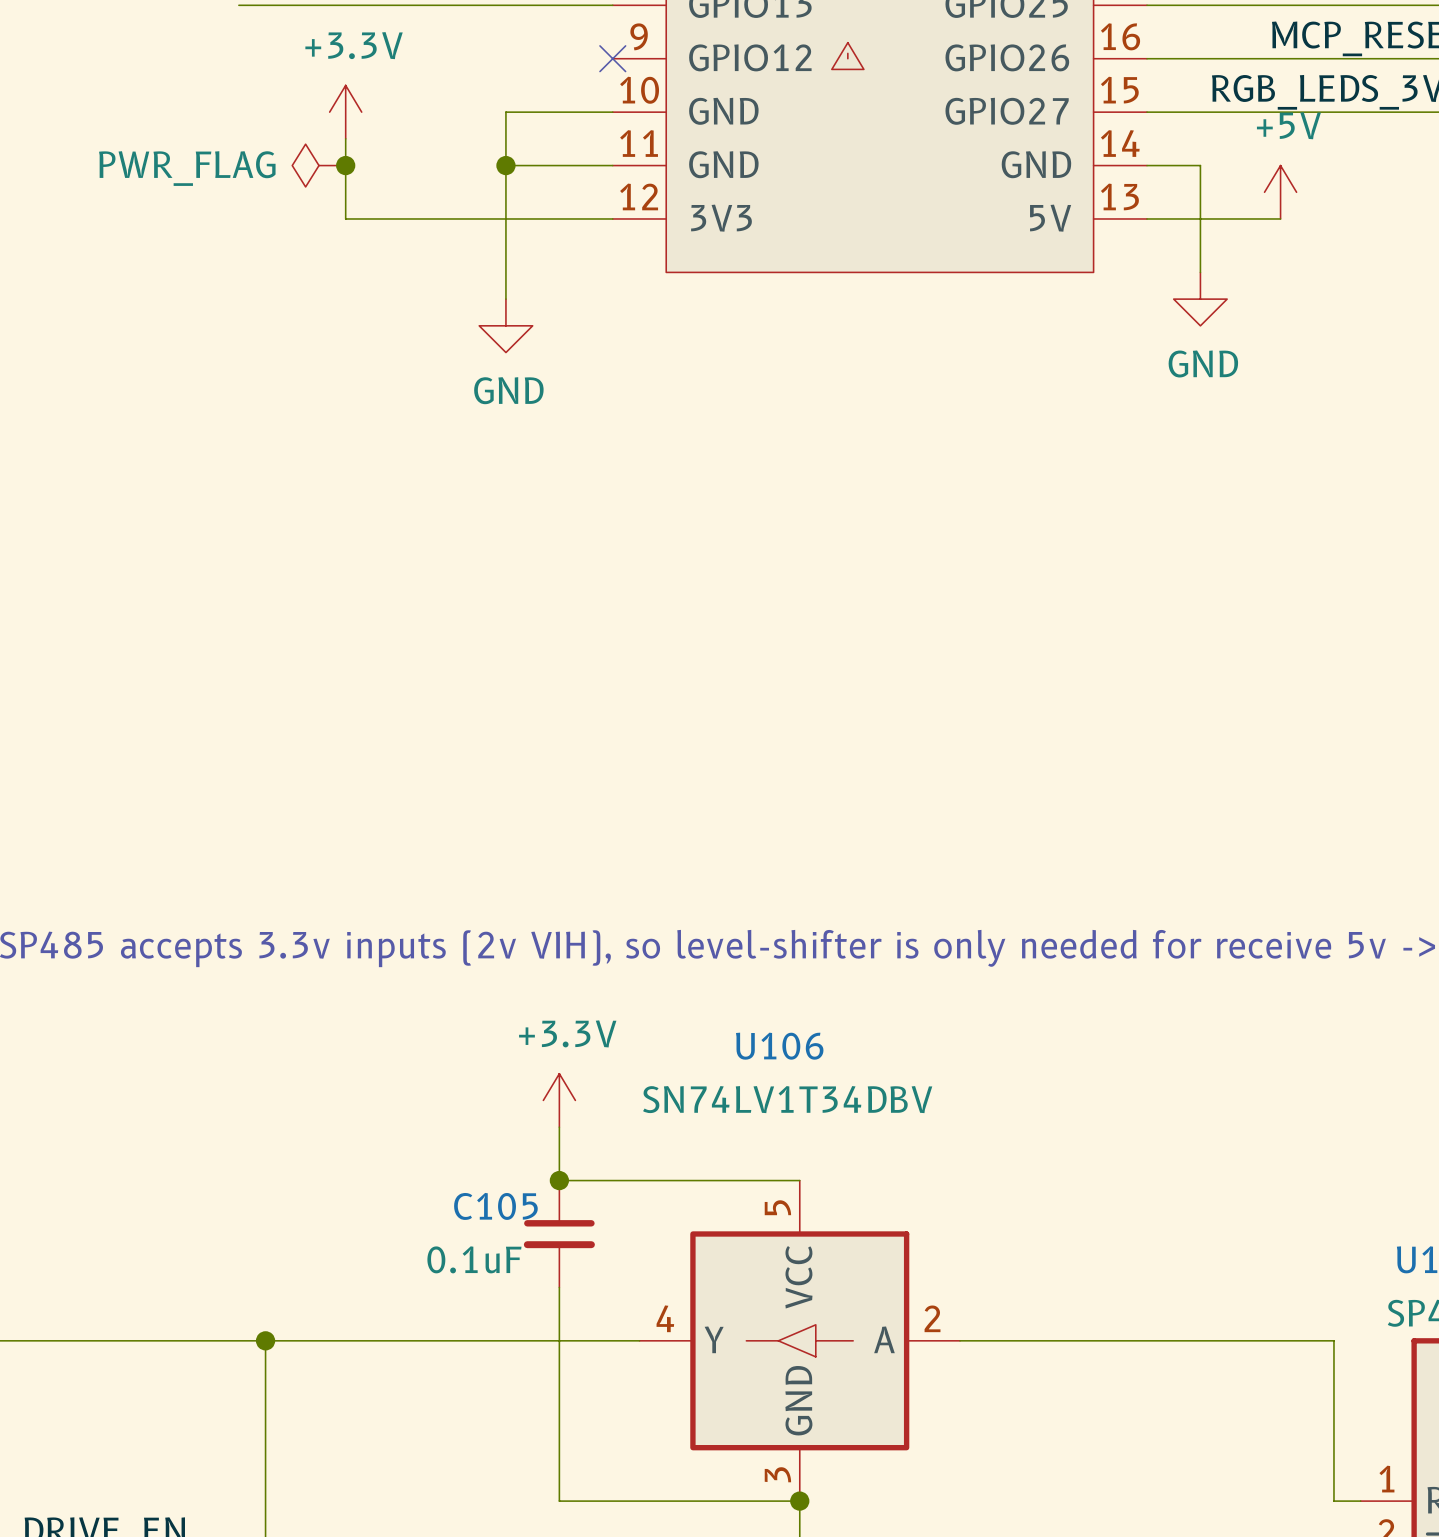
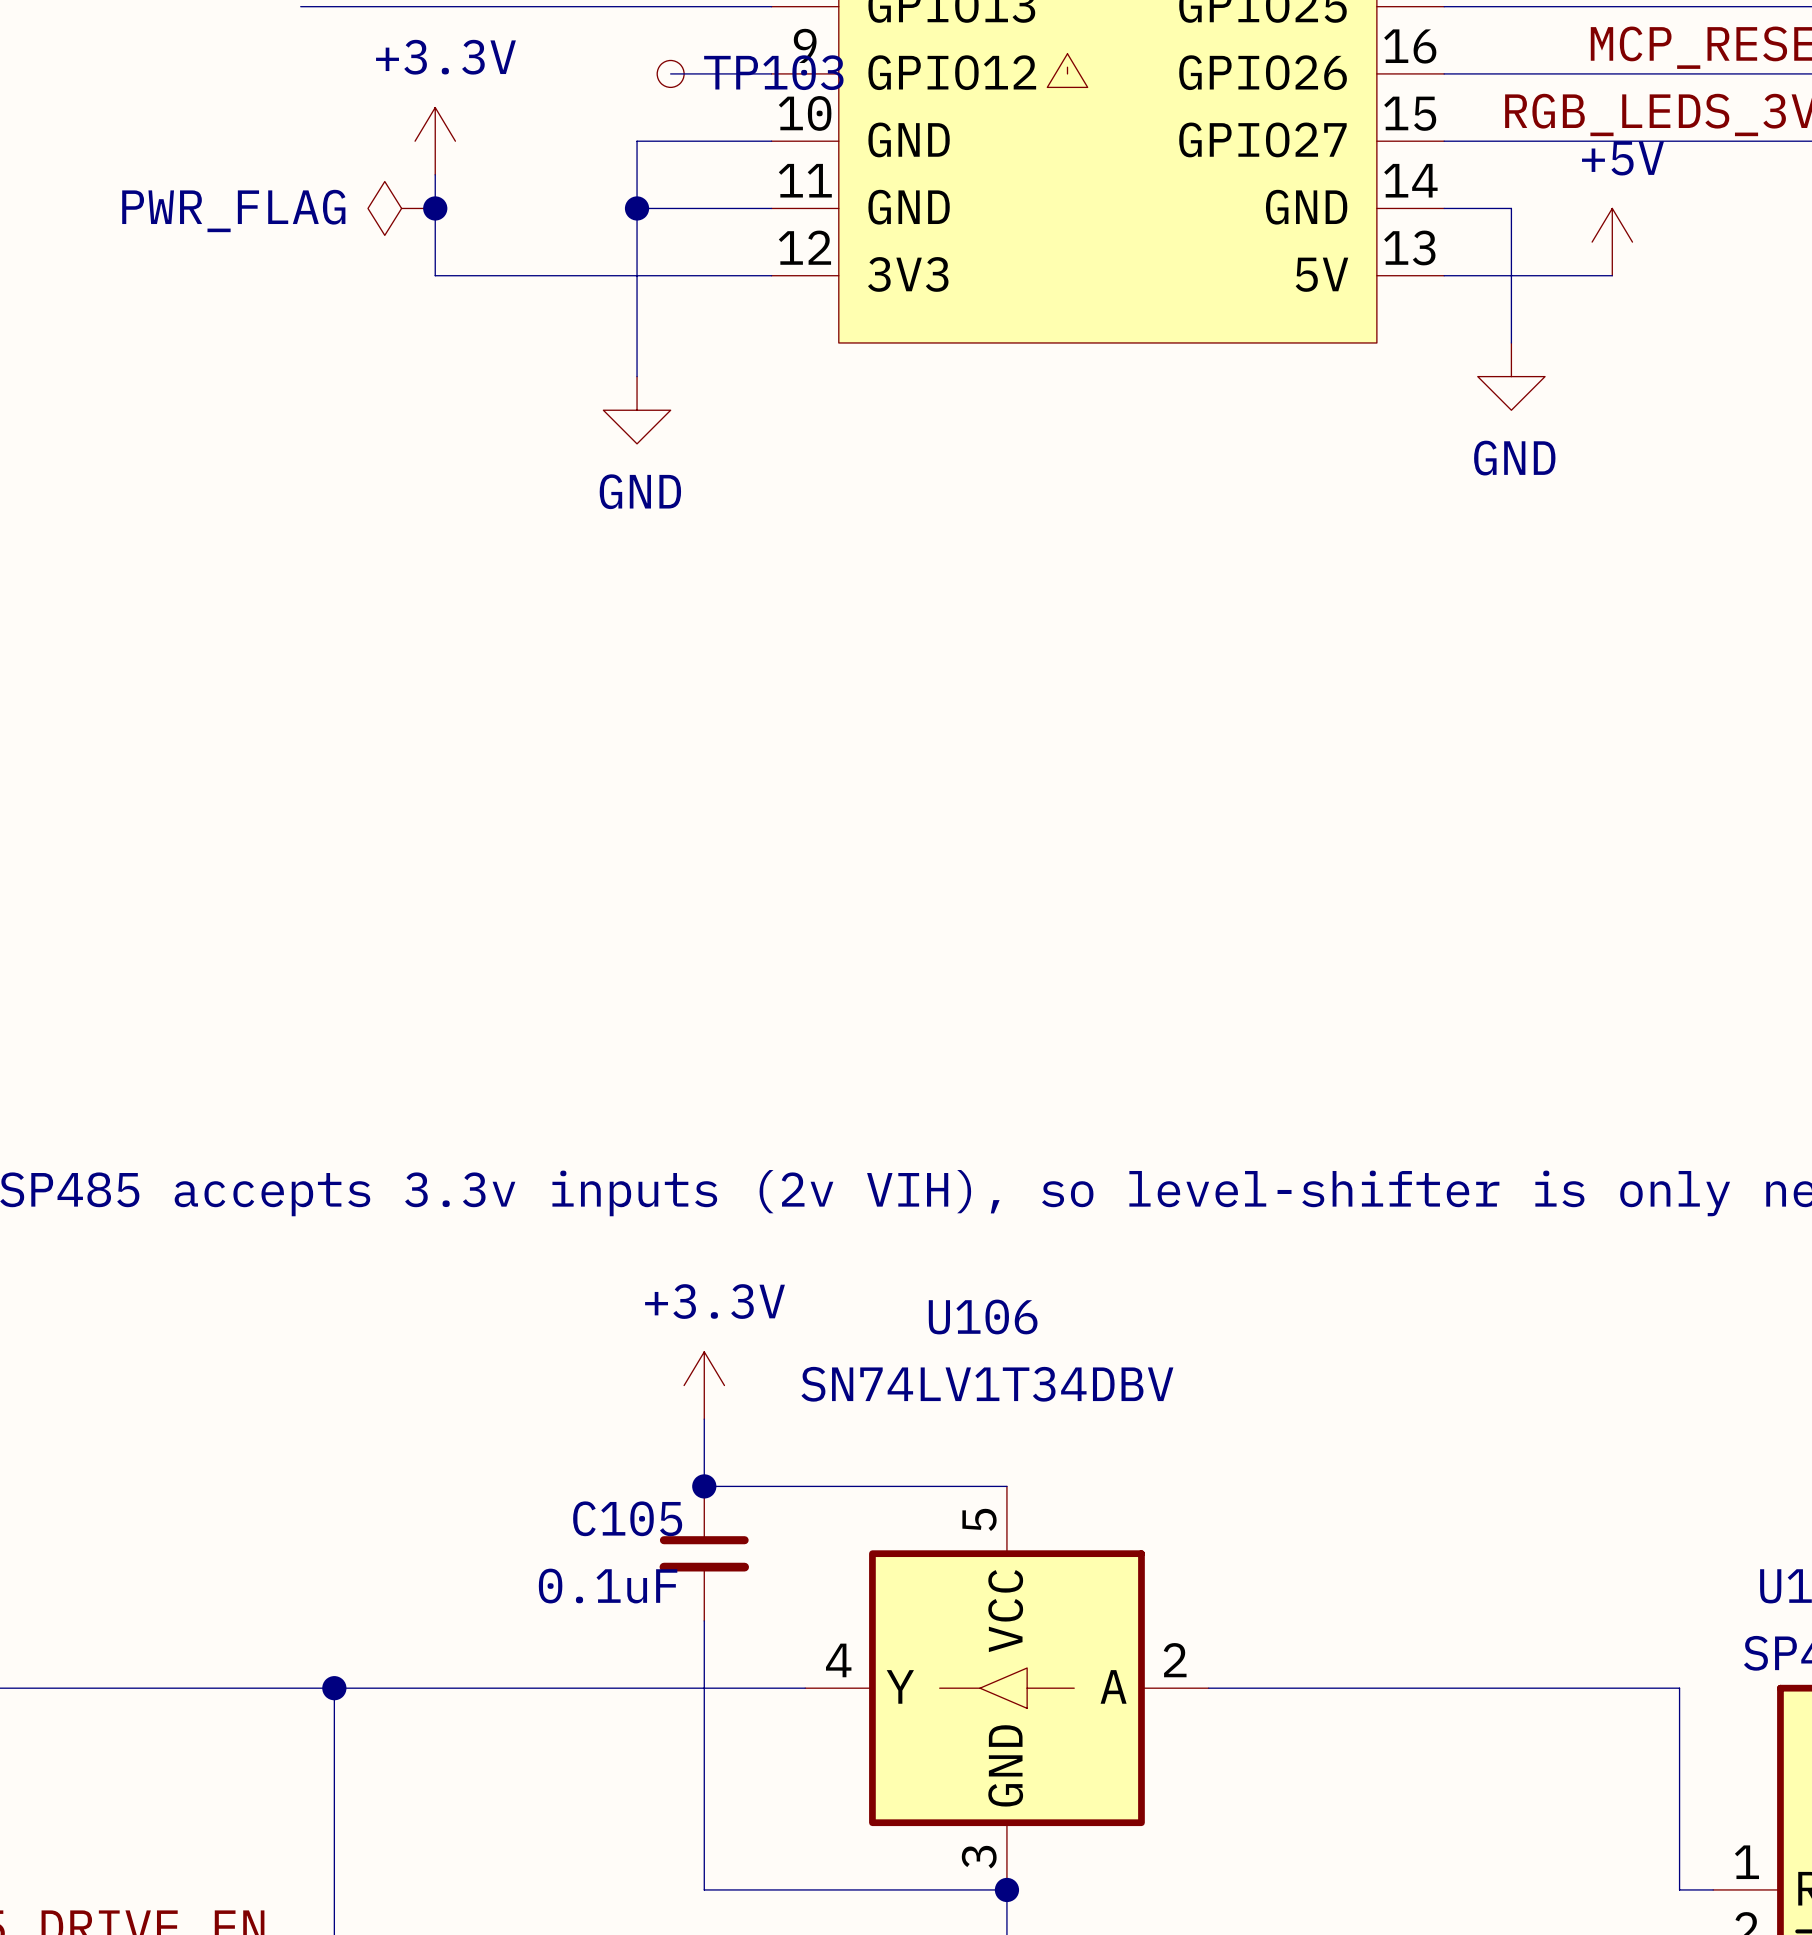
wire: none -> (670, 73) (771, 73)
TP103: none -> (670, 73)
no-connect mark: (612, 58) -> none

